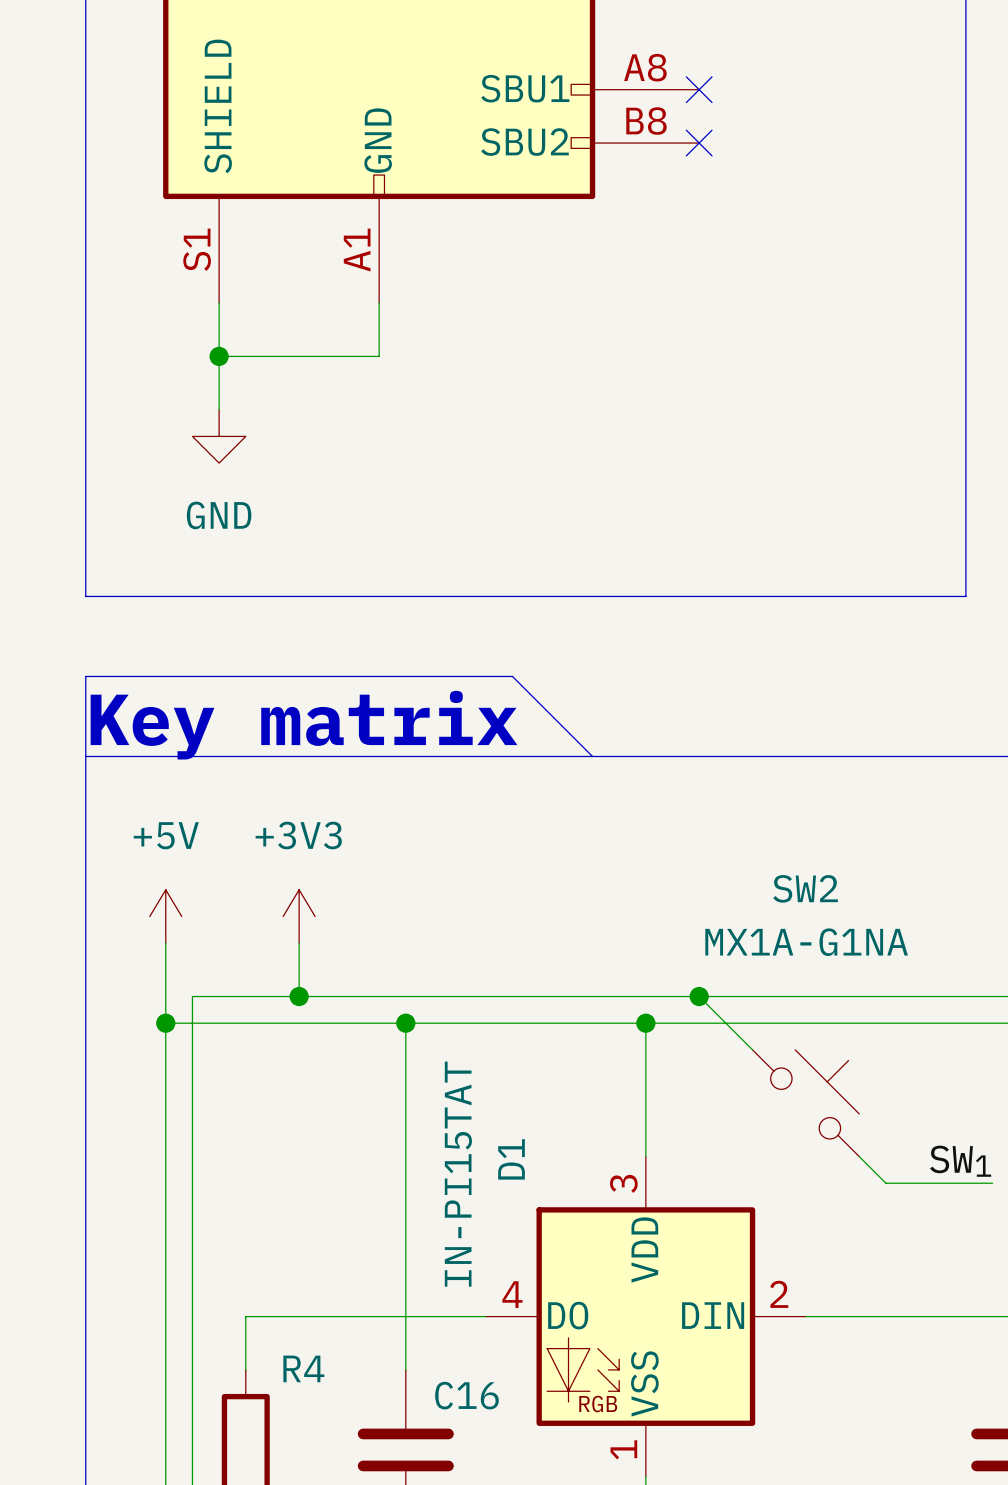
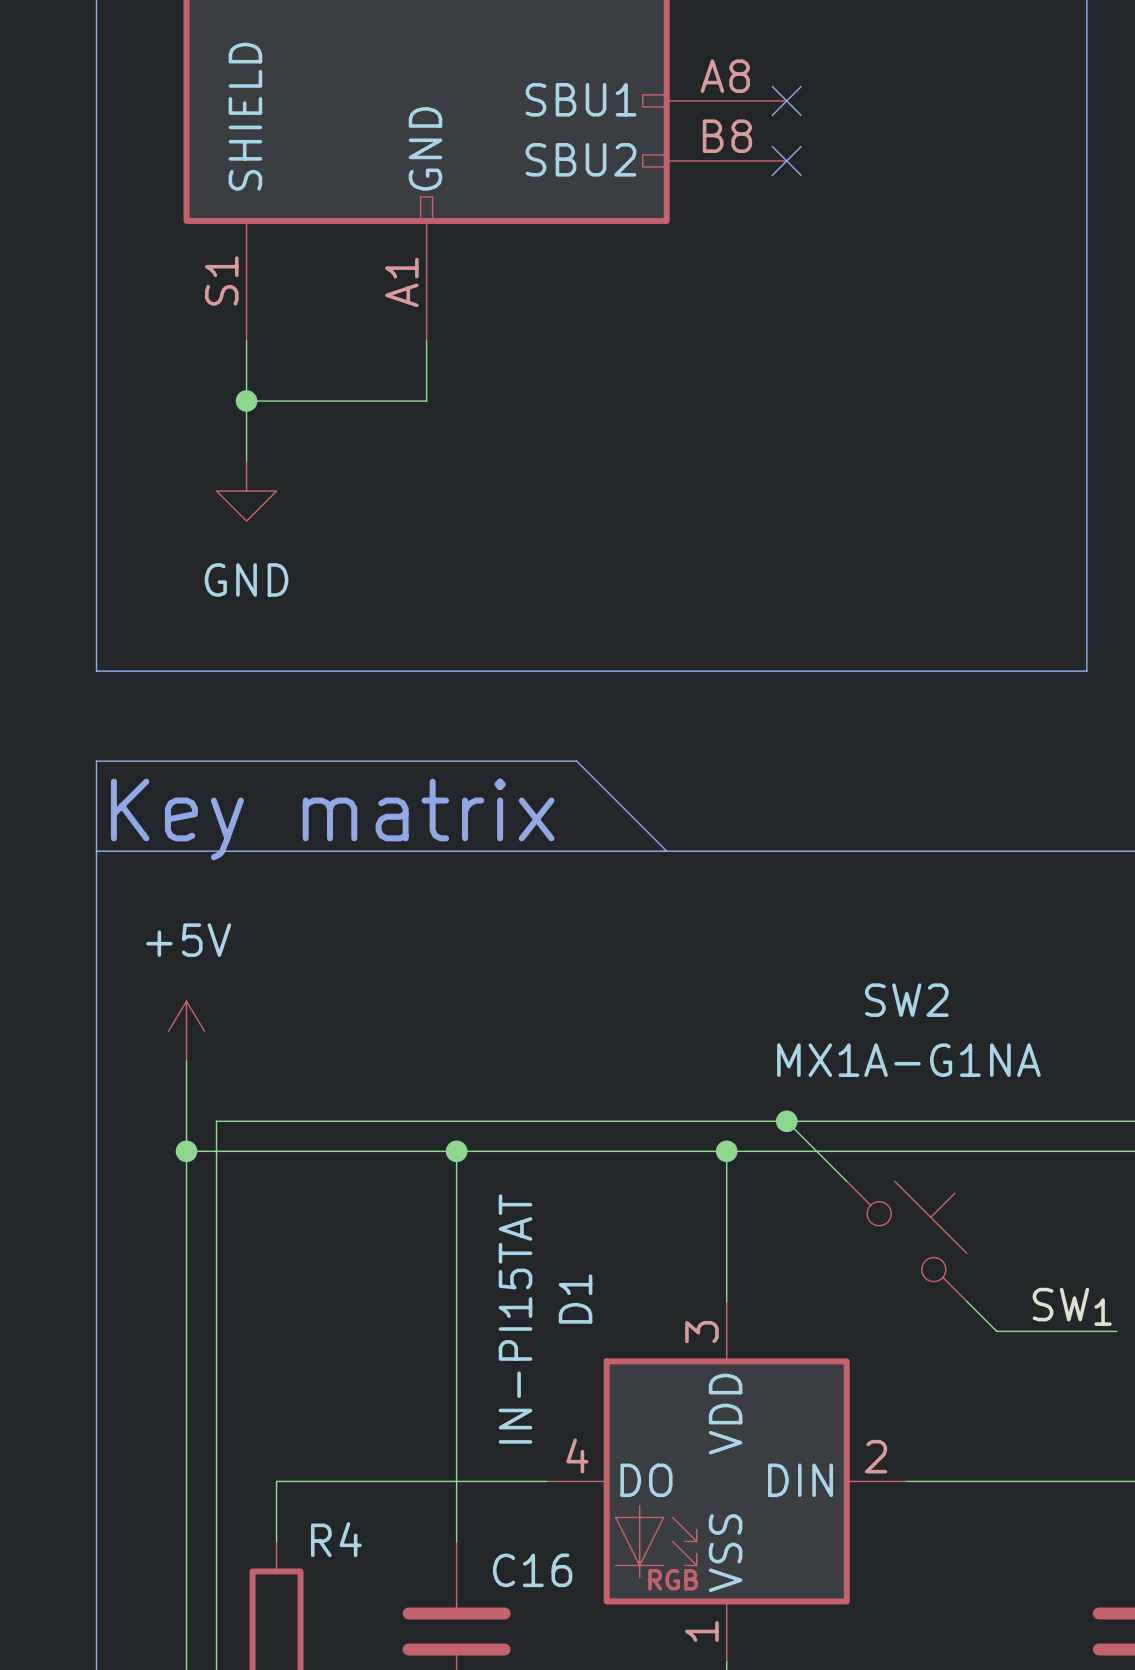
power symbol: +3V3 (299, 916) -> none
wire: (299, 943) (299, 996) -> none
junction: (299, 996) -> none

